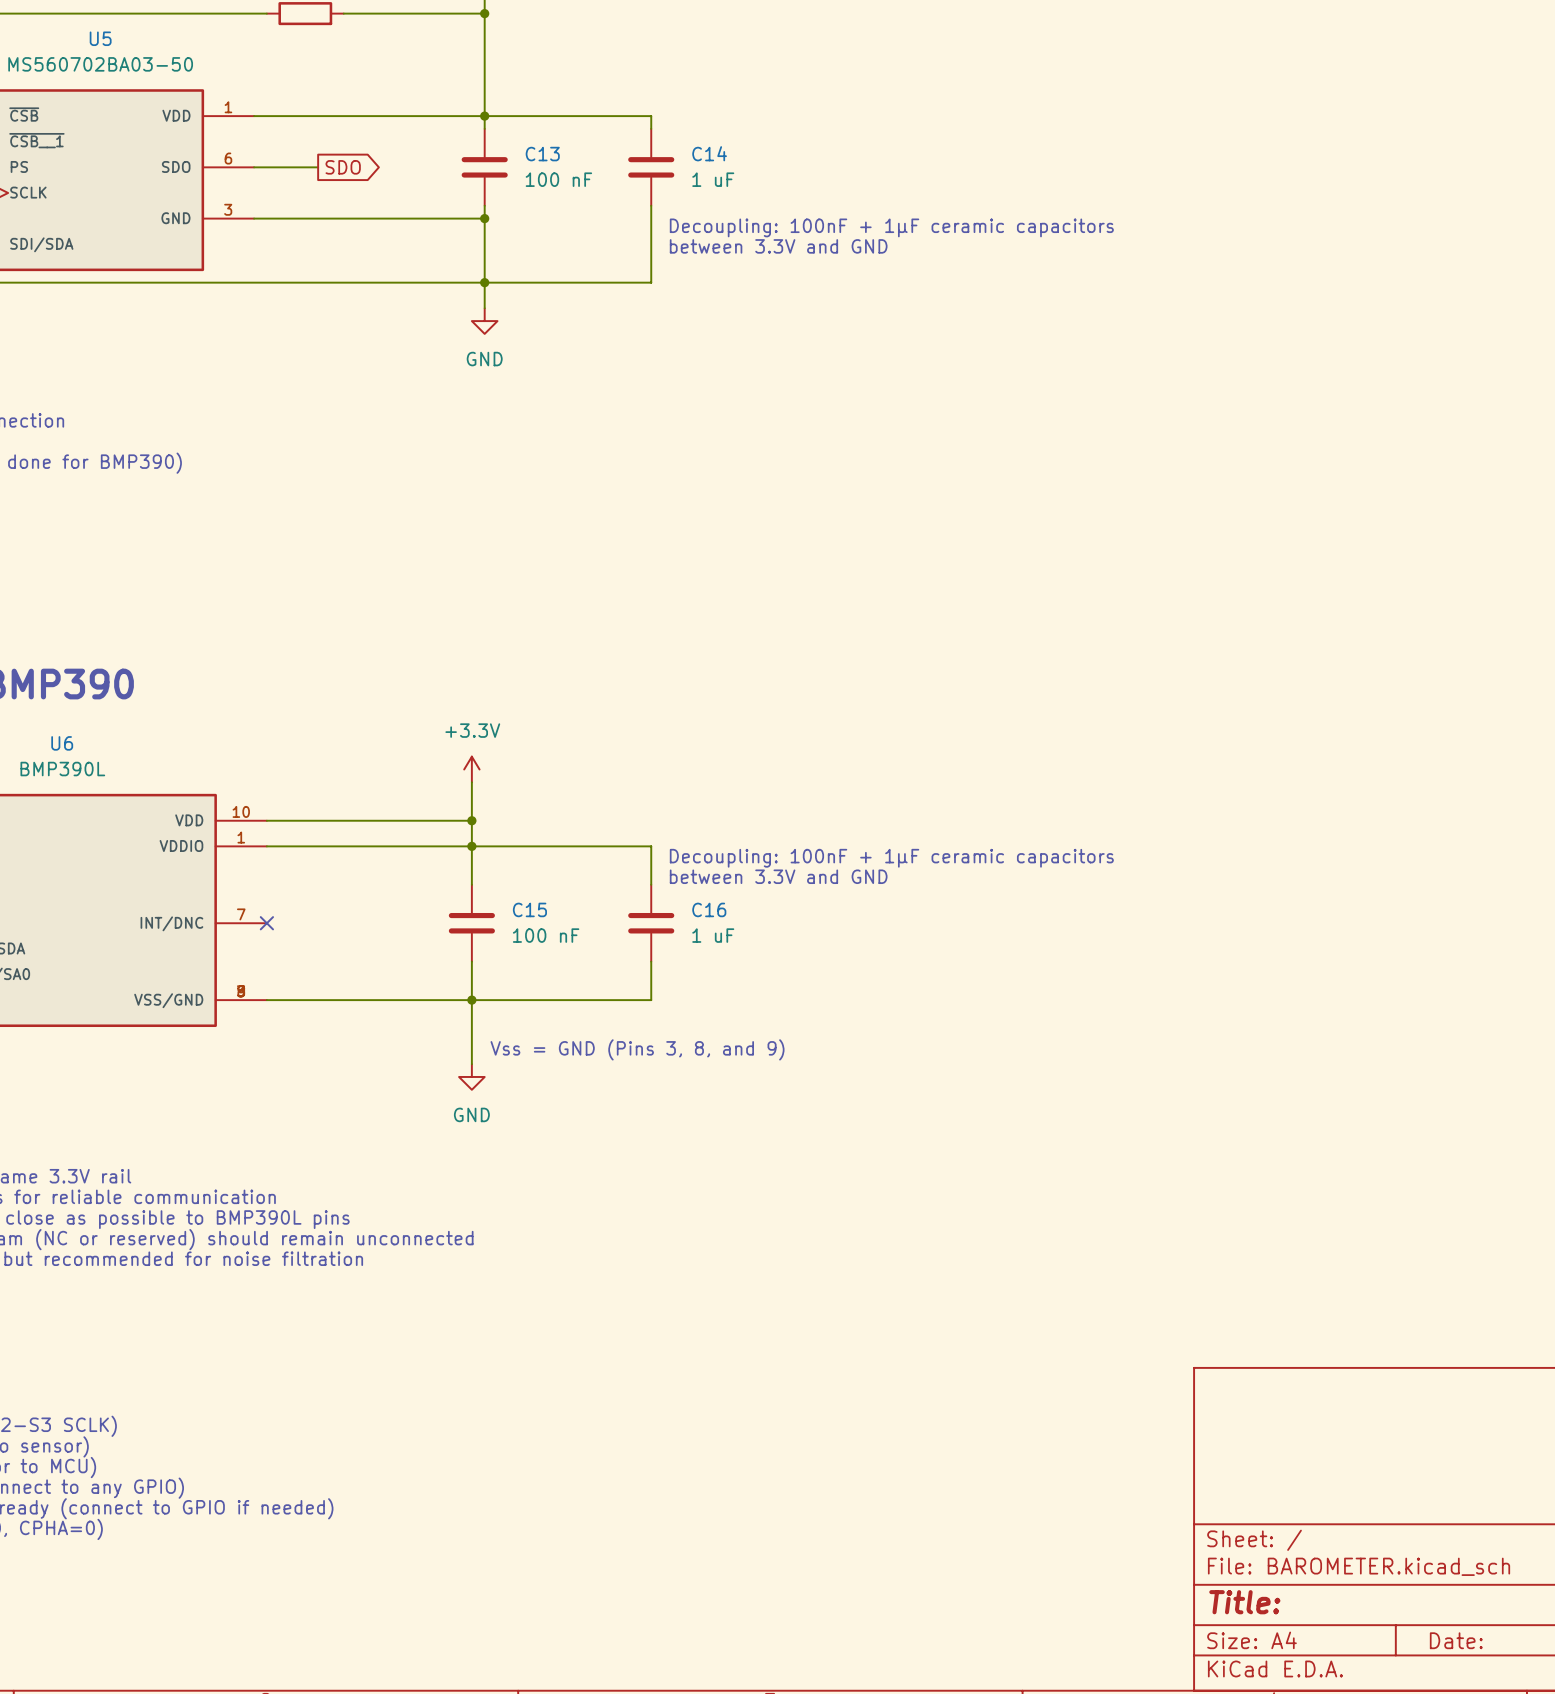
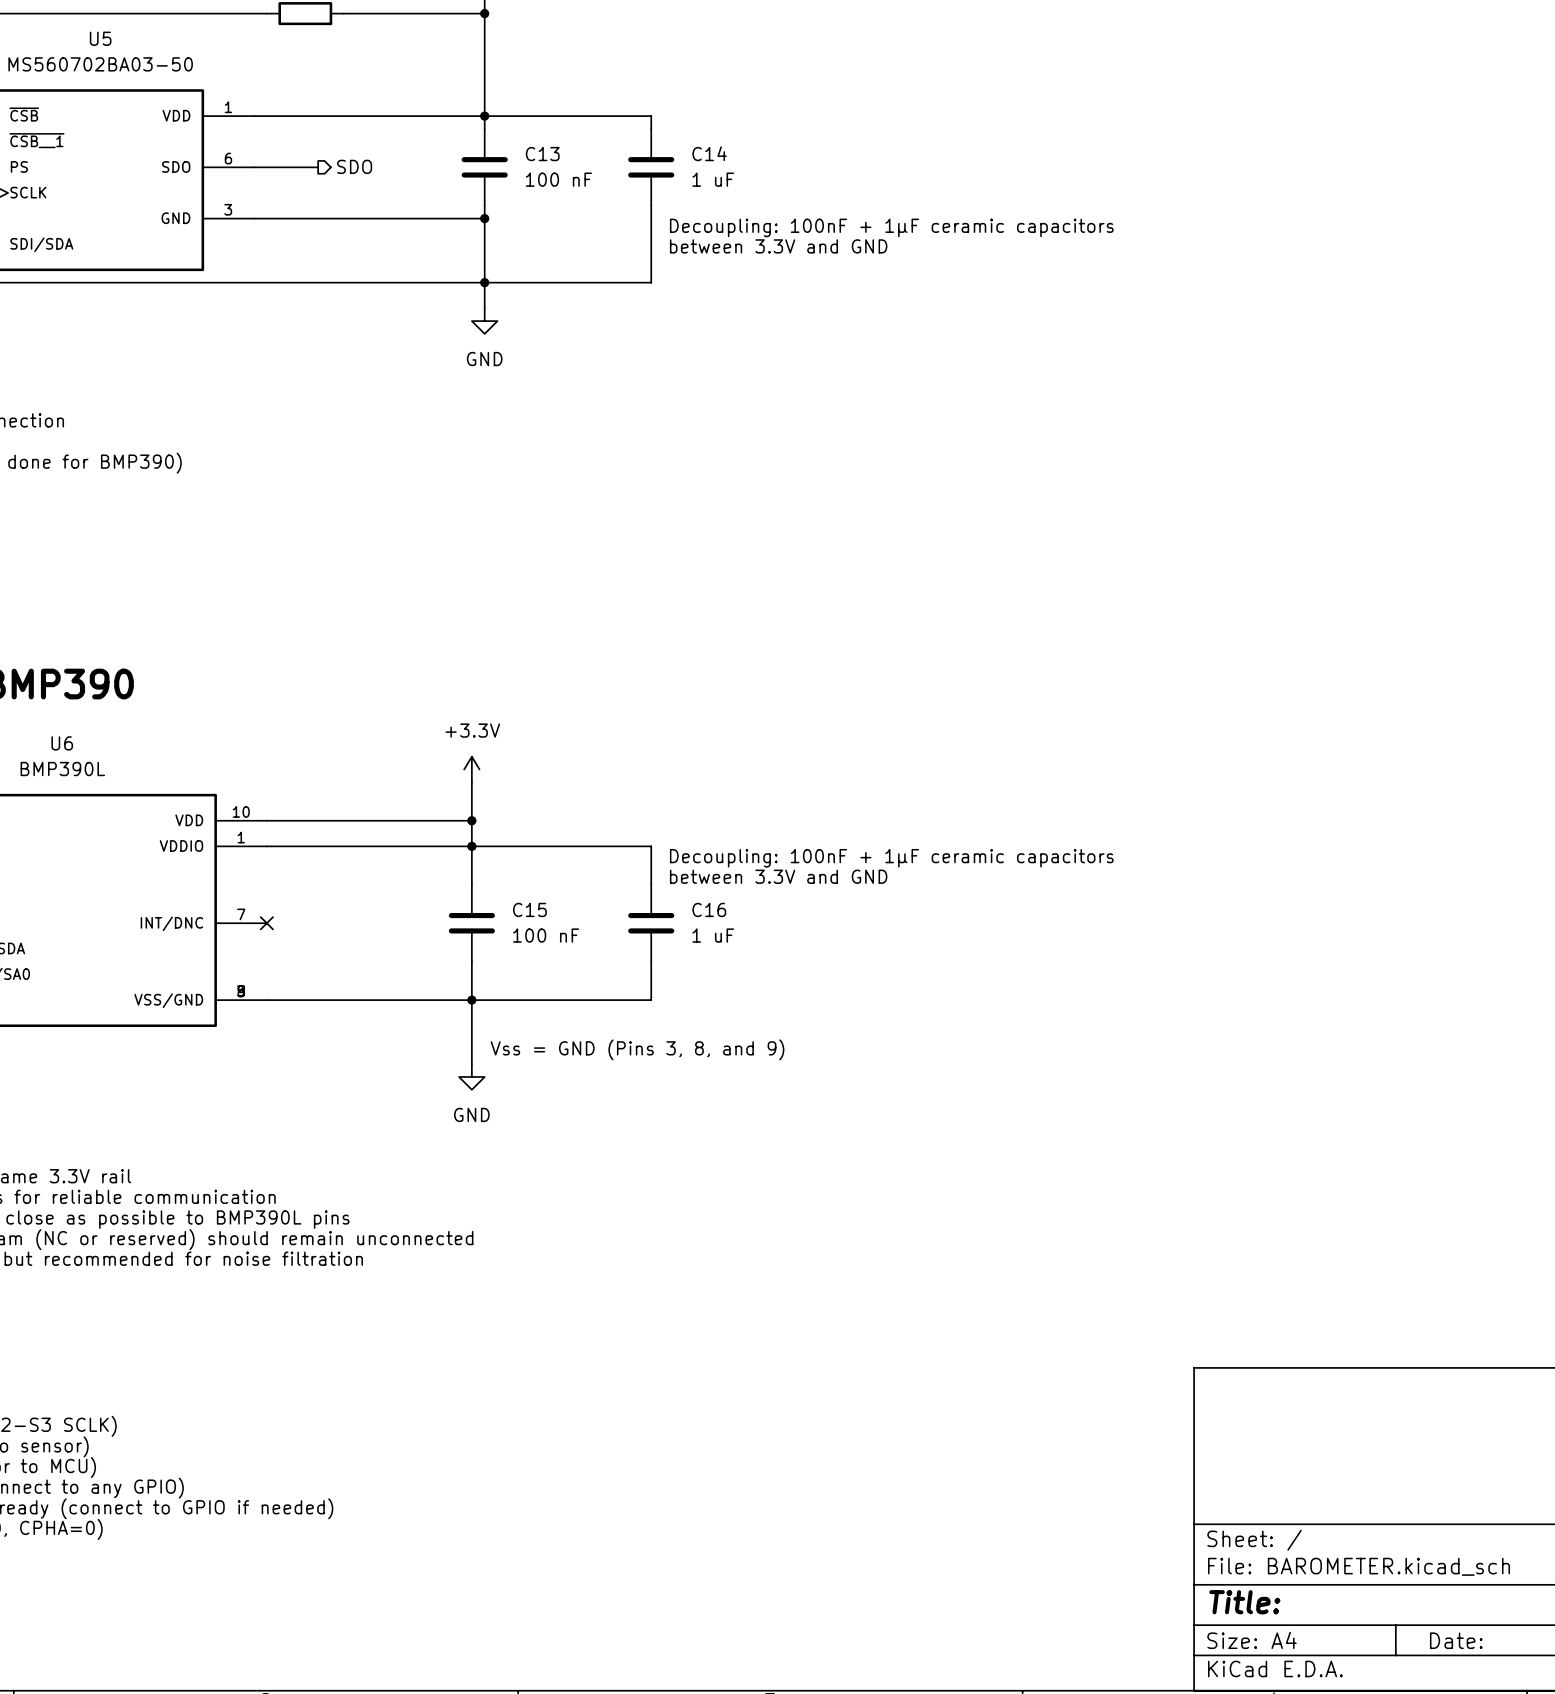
hierarchical label: none -> SDO (354, 166)
global label: SDO (343, 167) -> none

